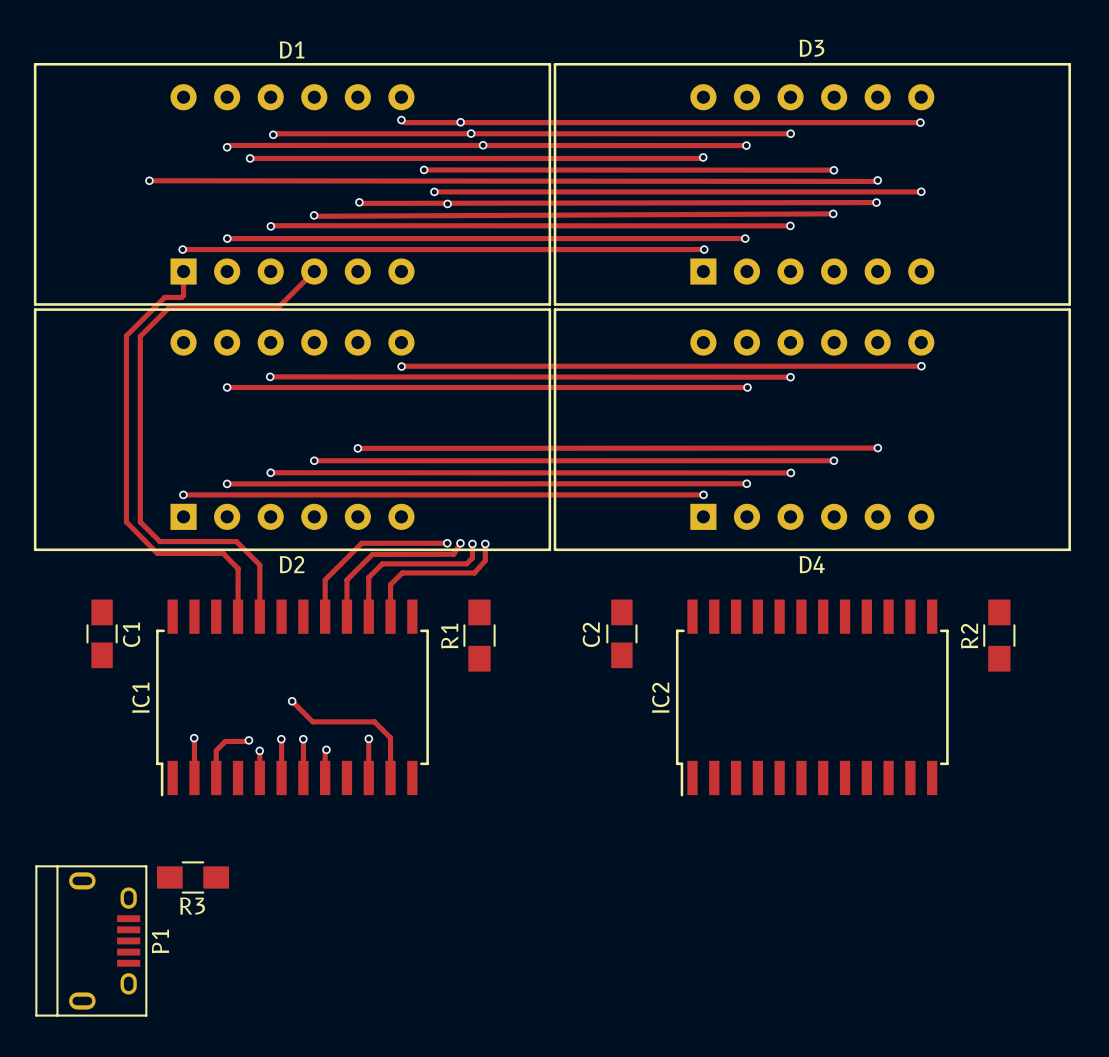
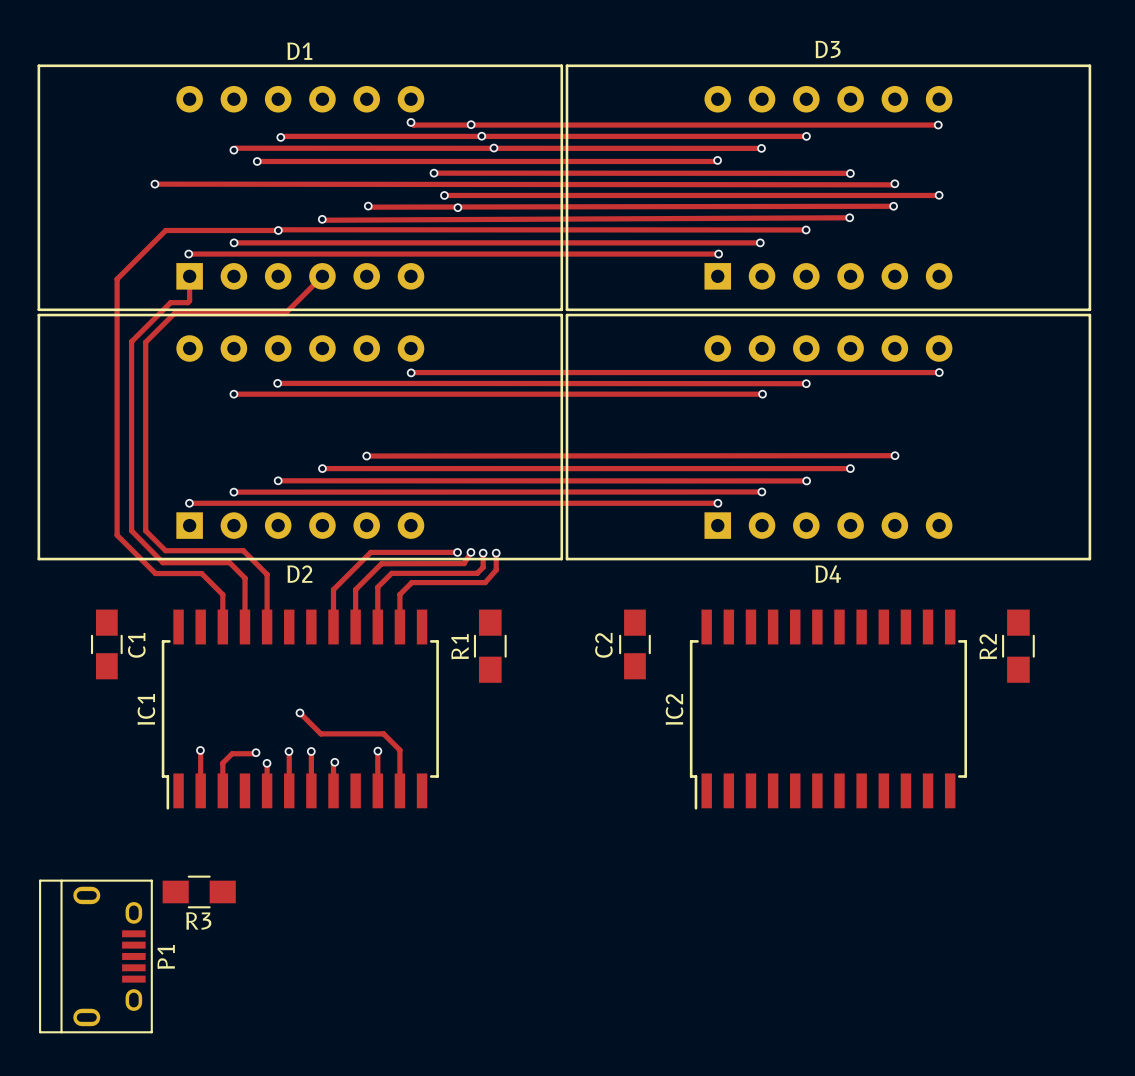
track: none -> (278, 230) (165, 230) (117, 279) (117, 535) (155, 573)
track: none -> (155, 573) (201, 573) (222, 594) (222, 627)

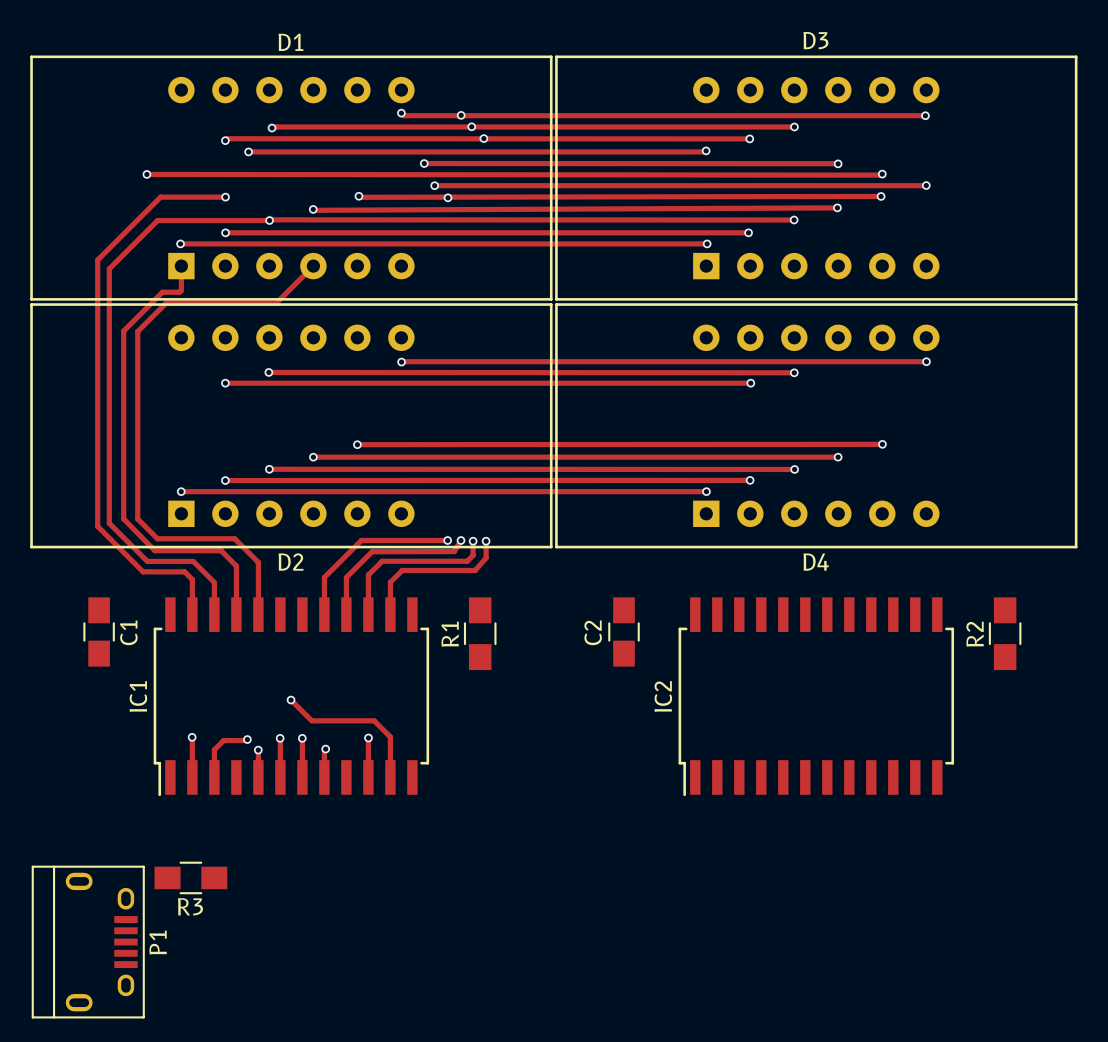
track: none -> (225, 197) (160, 197) (97, 260) (97, 526) (143, 571) (184, 571) (192, 579) (192, 614)
via: none -> (225, 197)

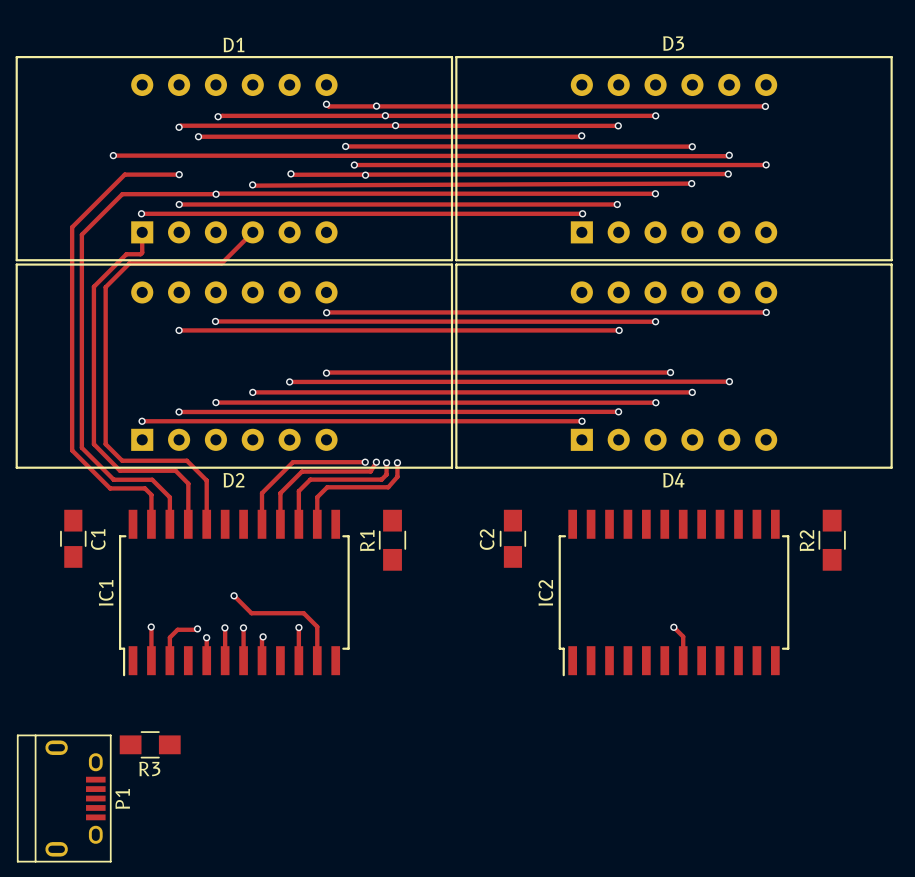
track: none -> (670, 372) (326, 373)
via: none -> (670, 372)
via: none -> (326, 373)
track: none -> (673, 627) (683, 636) (683, 660)
via: none -> (673, 627)

